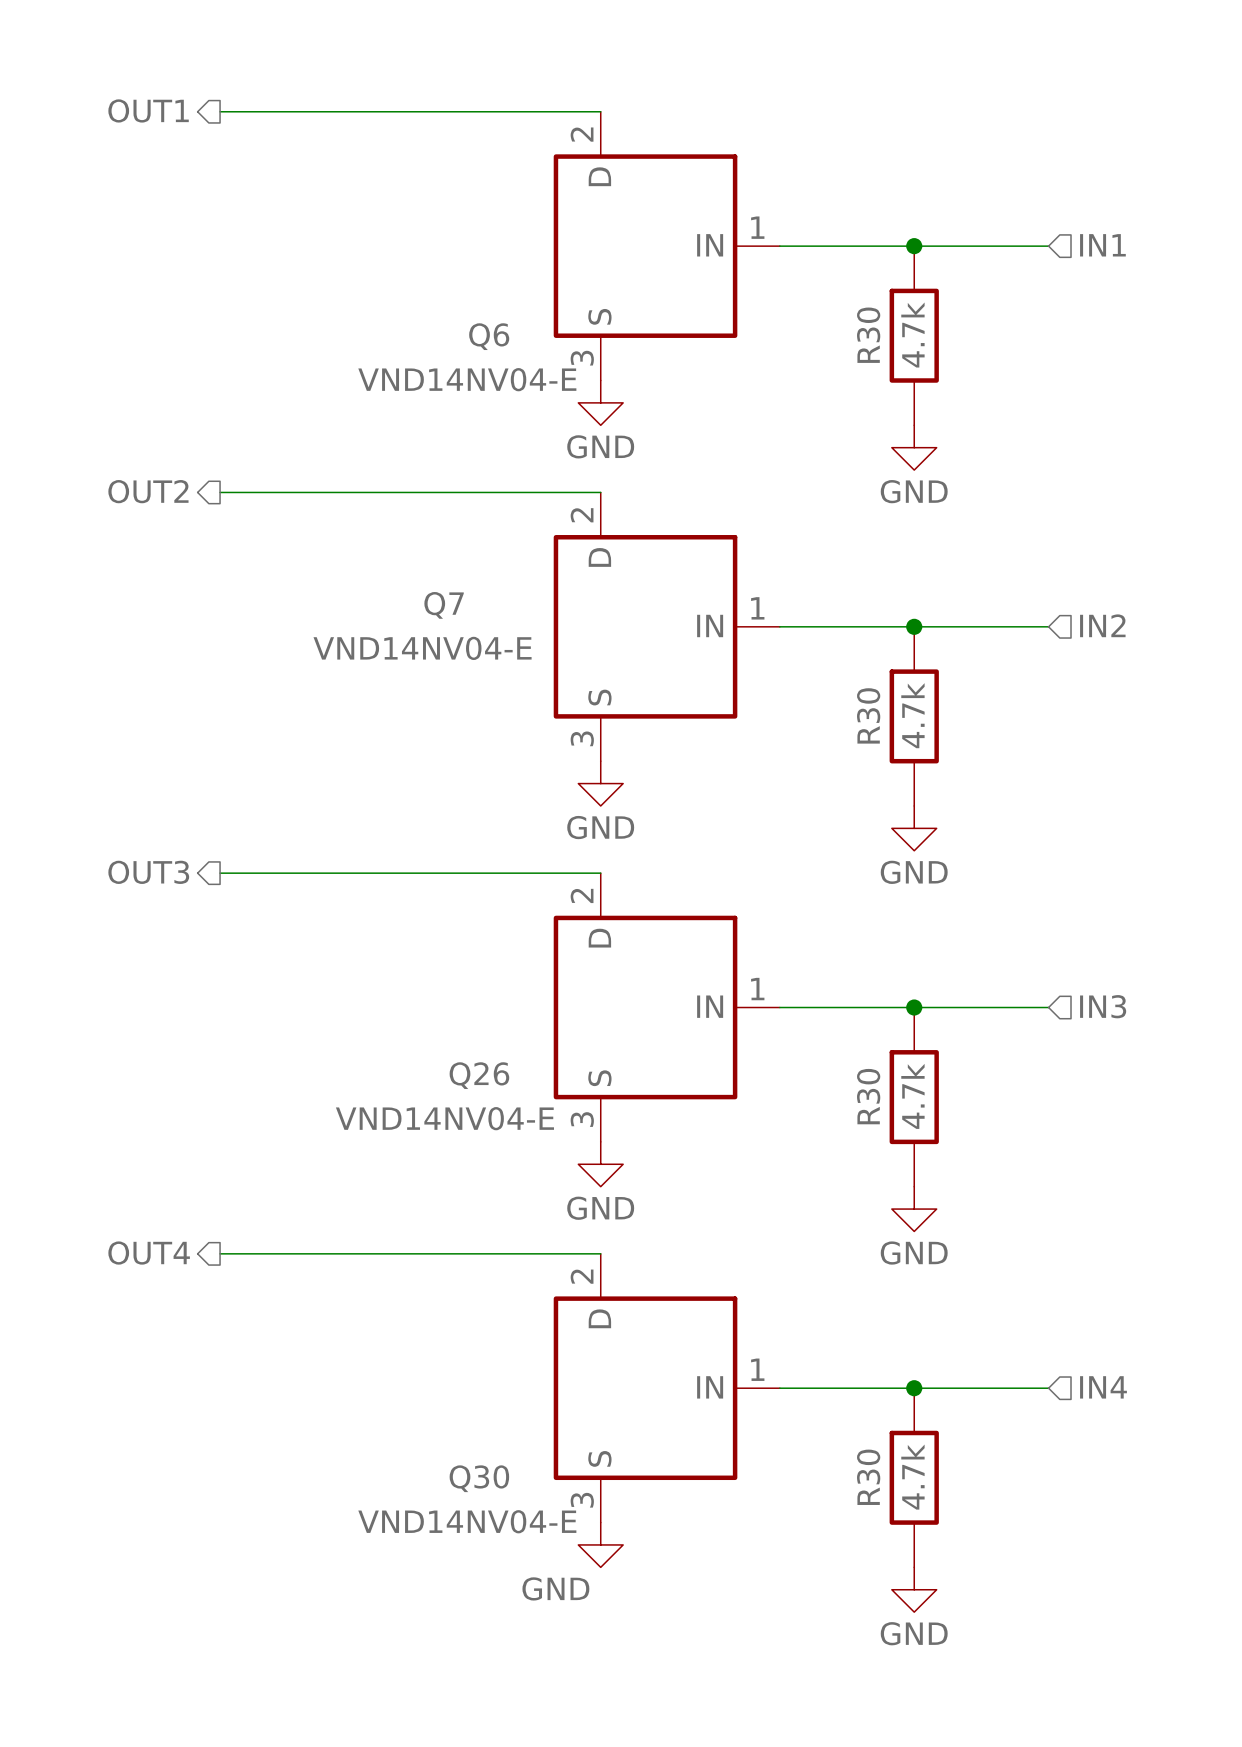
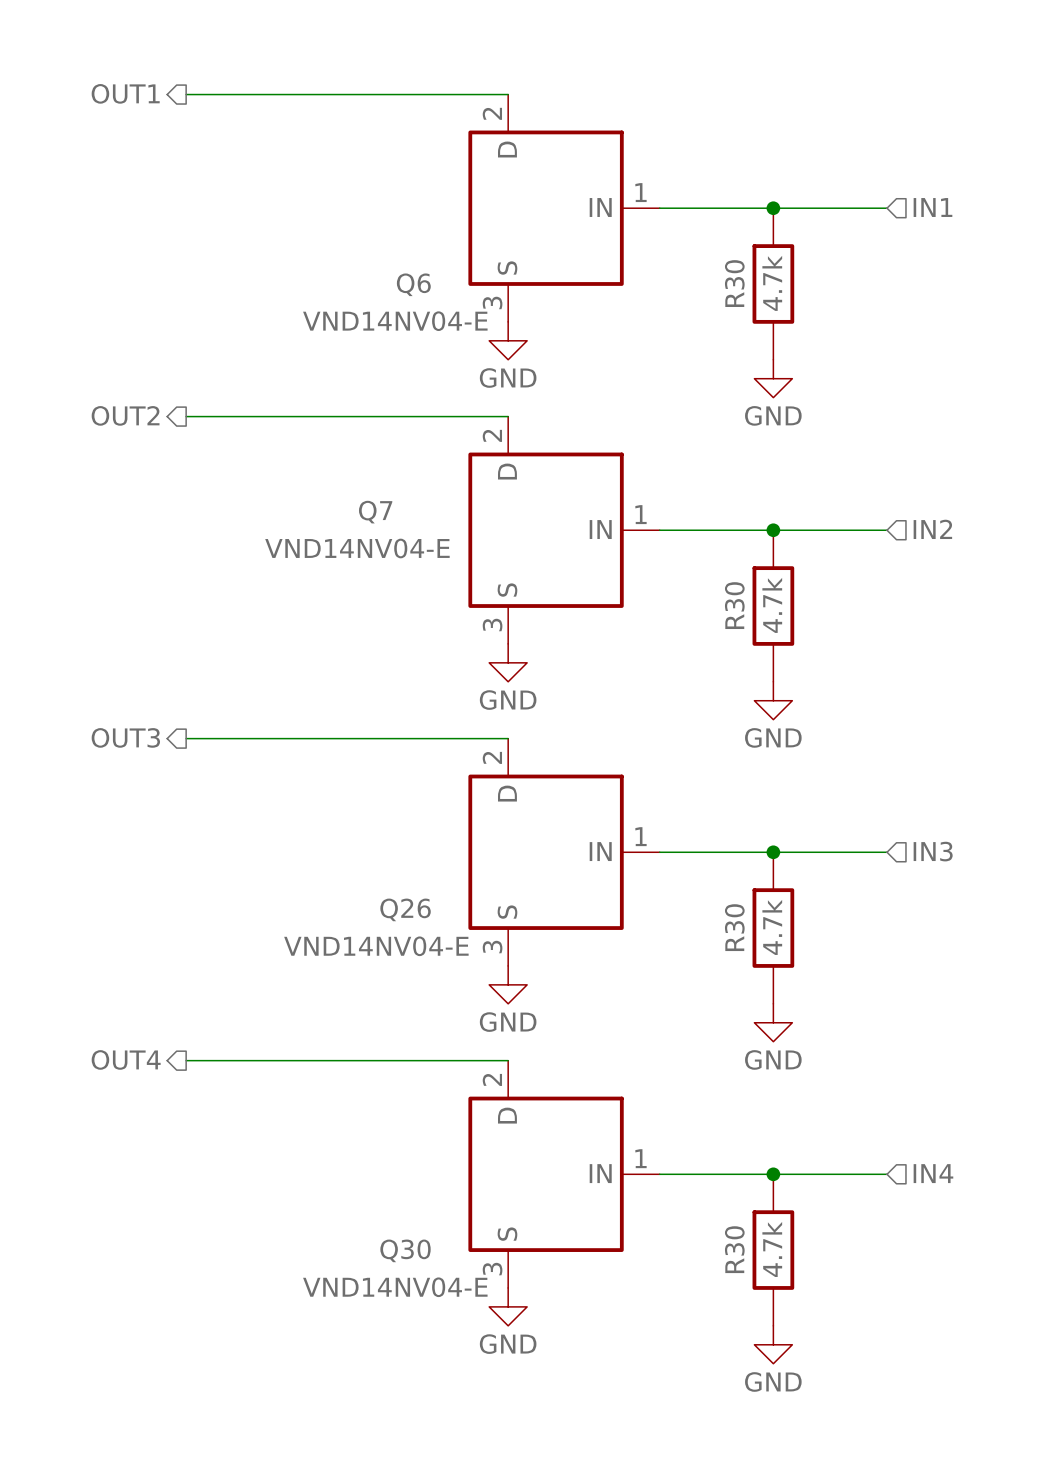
power symbol text position: GND (555, 1588) -> GND (508, 1344)

